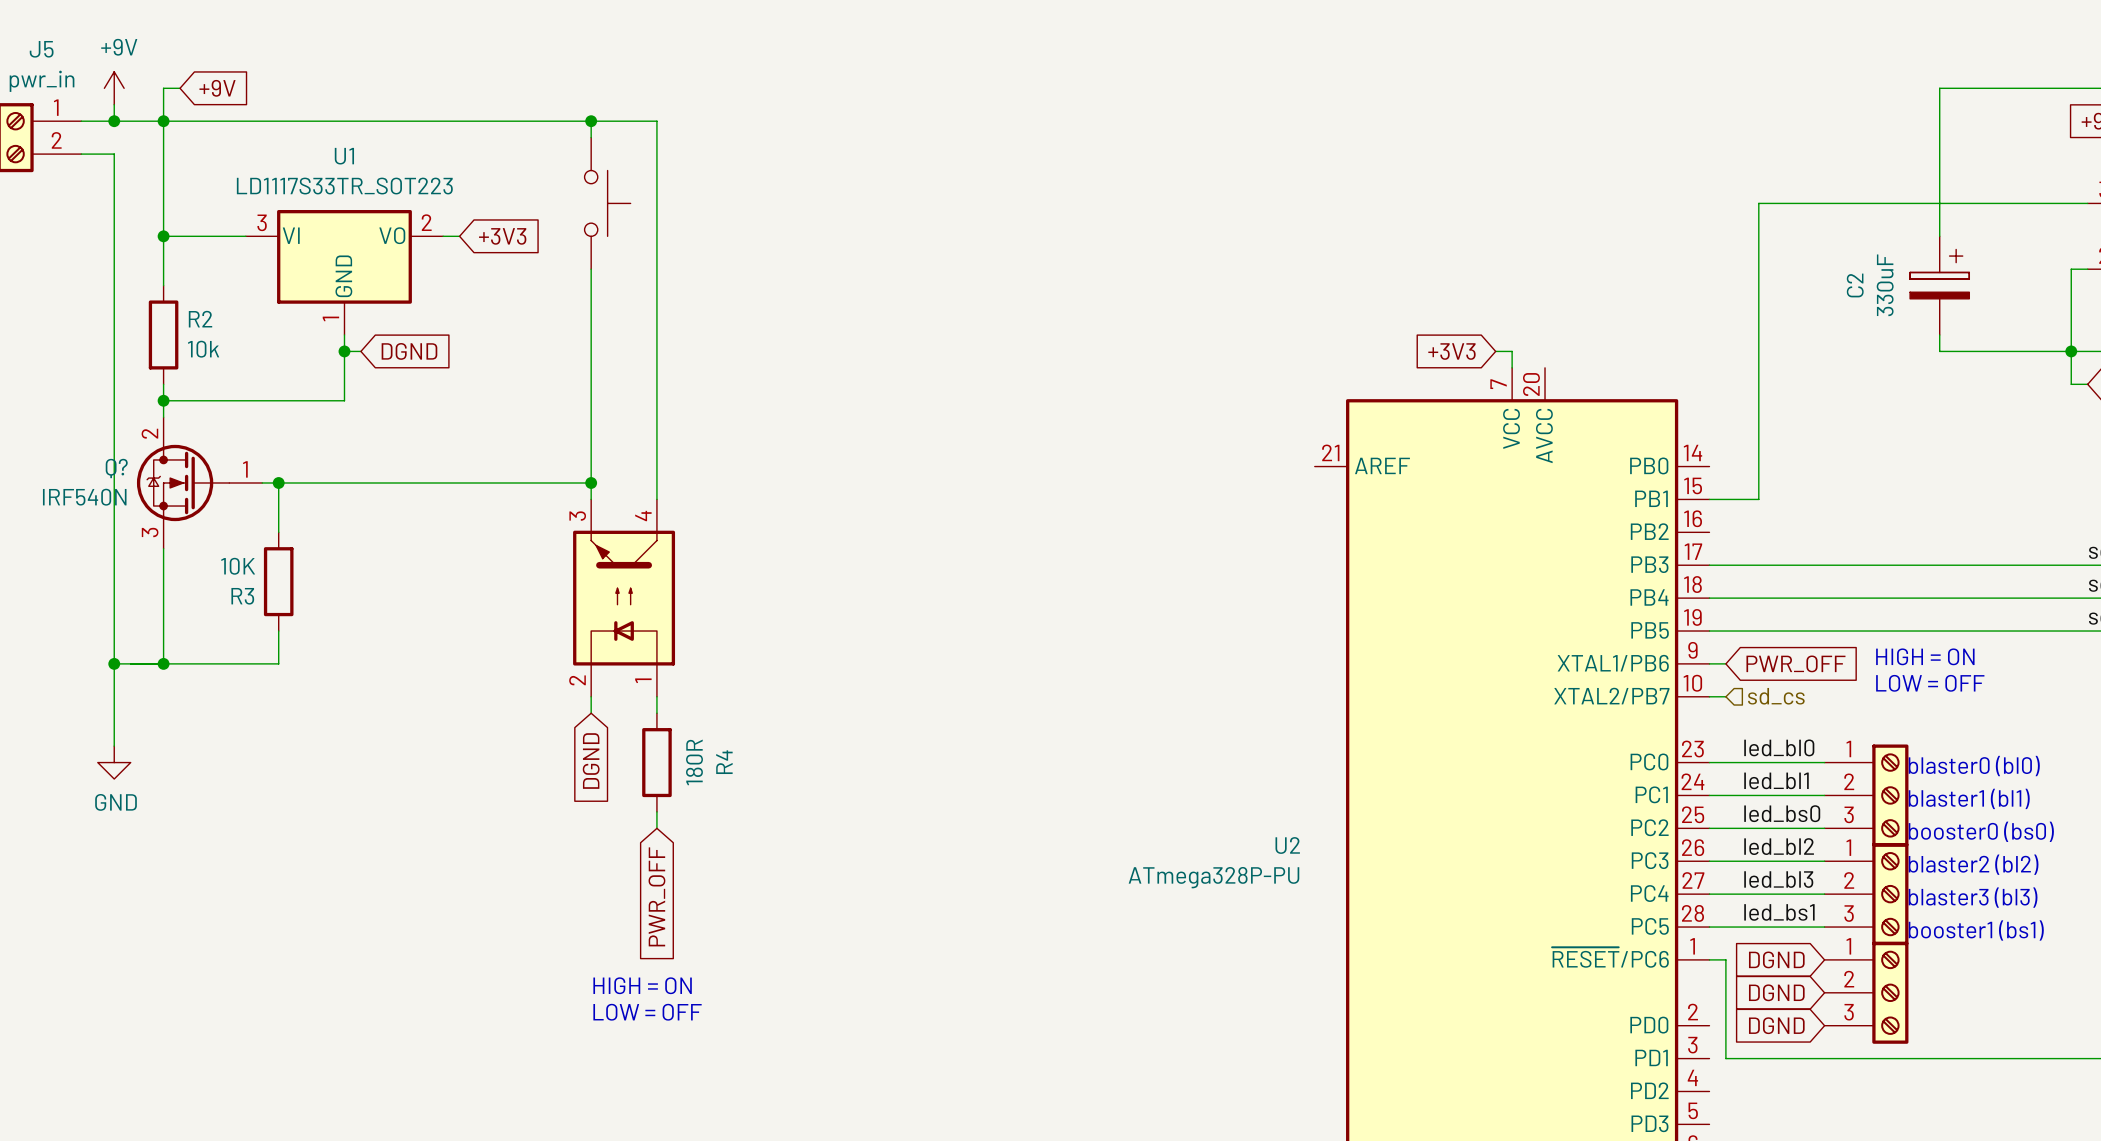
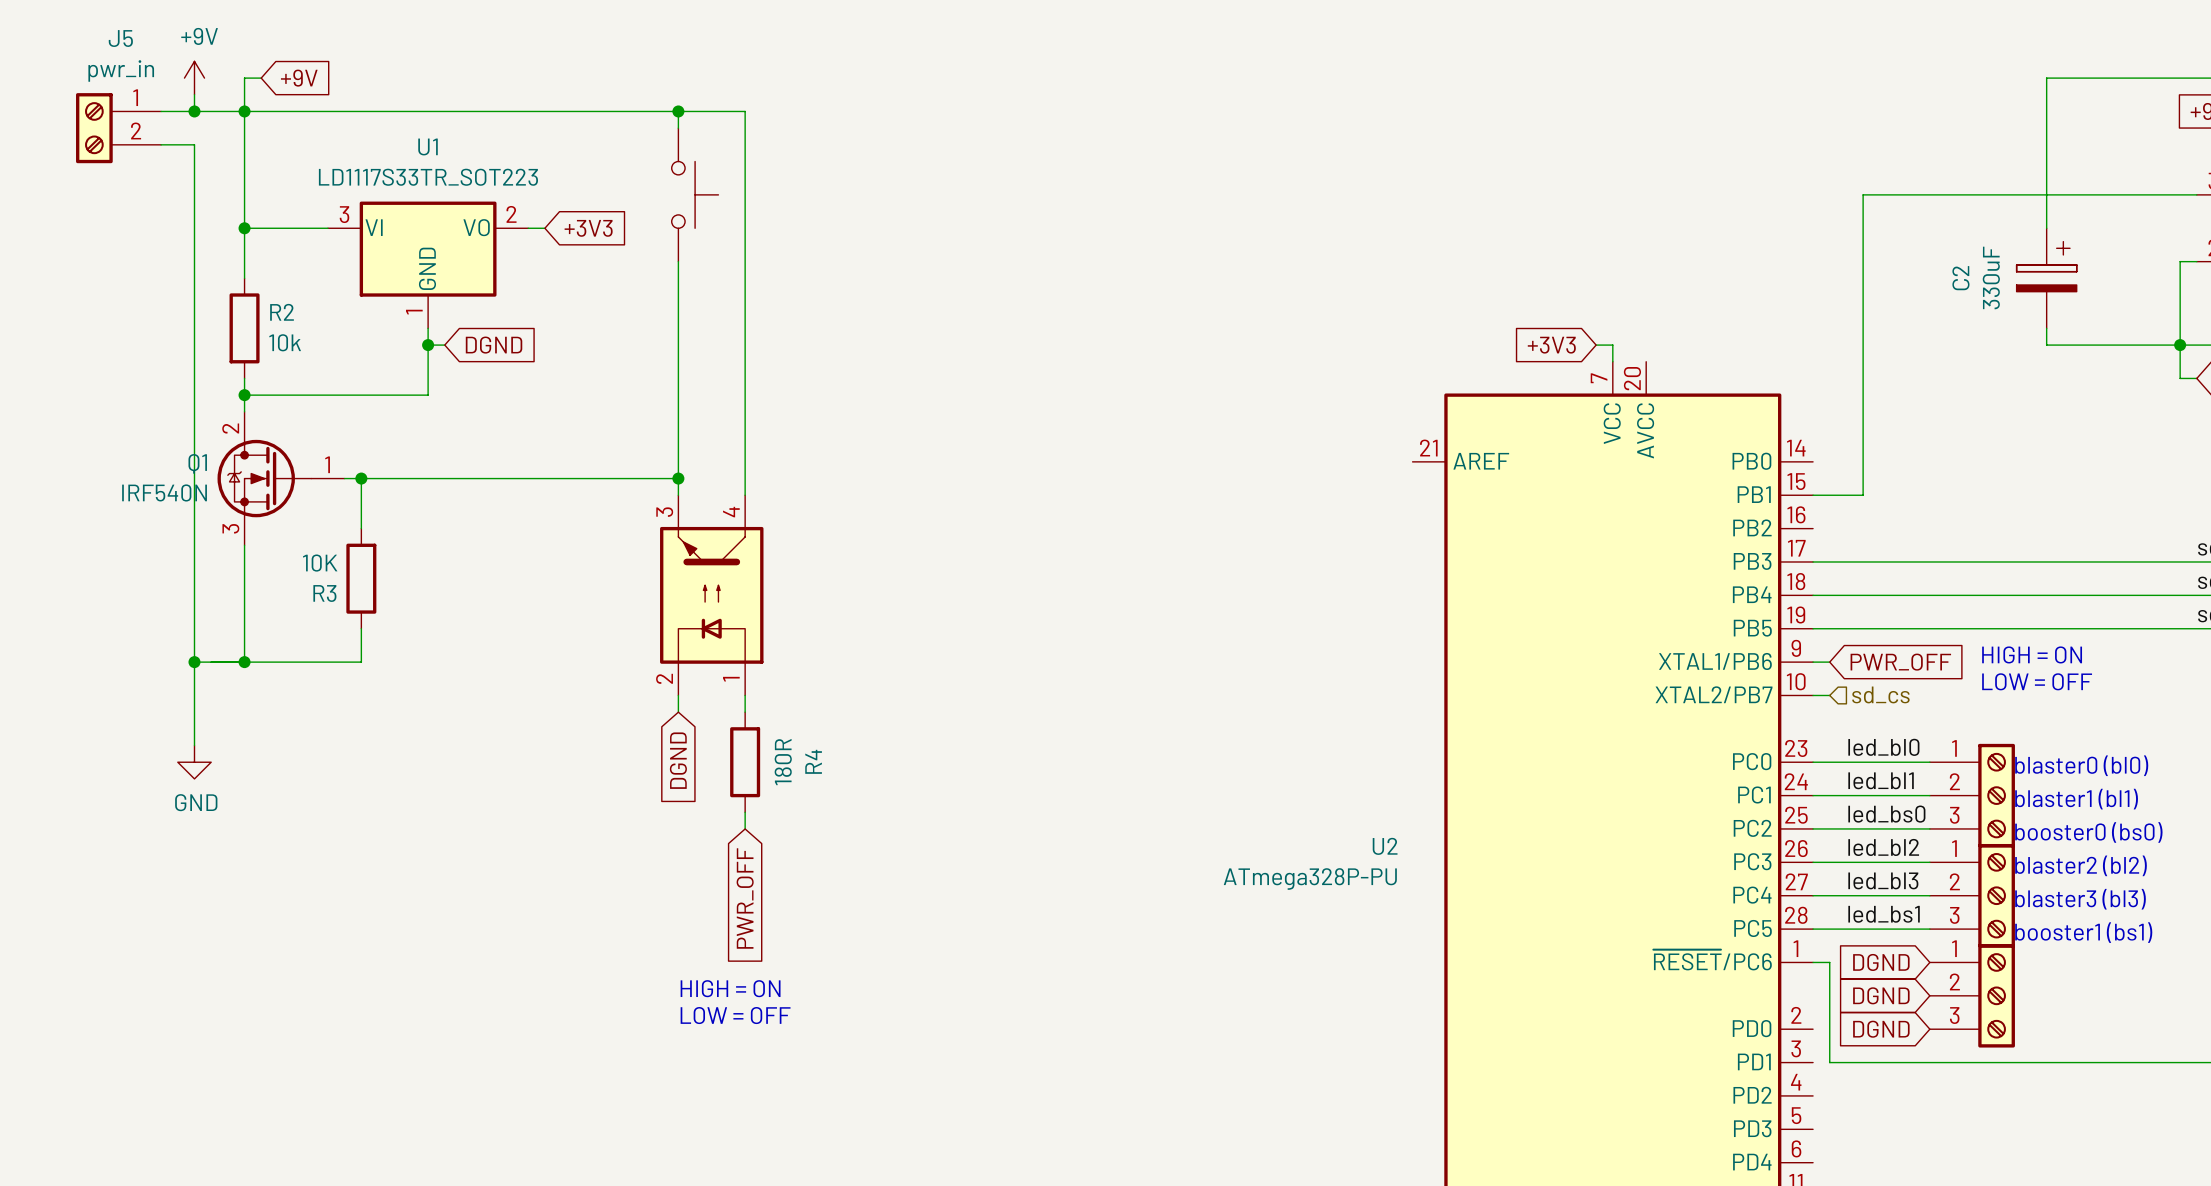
Q? name: Q? (116, 468) -> Q1 (197, 463)

